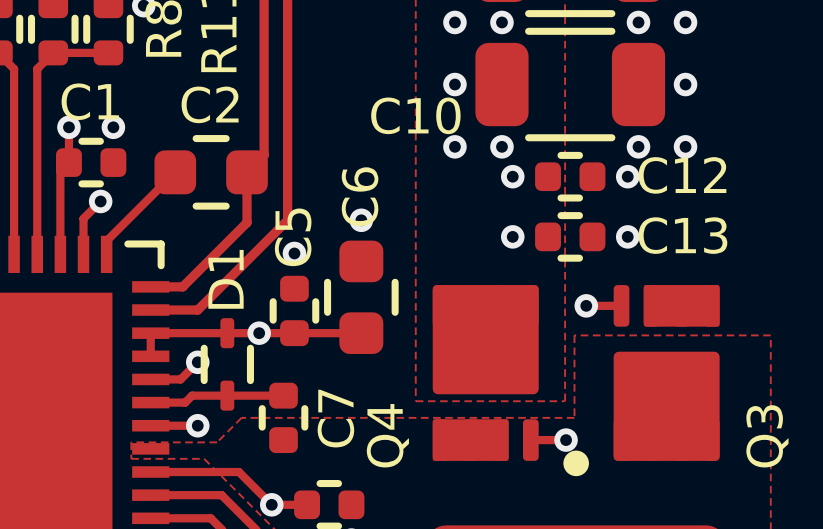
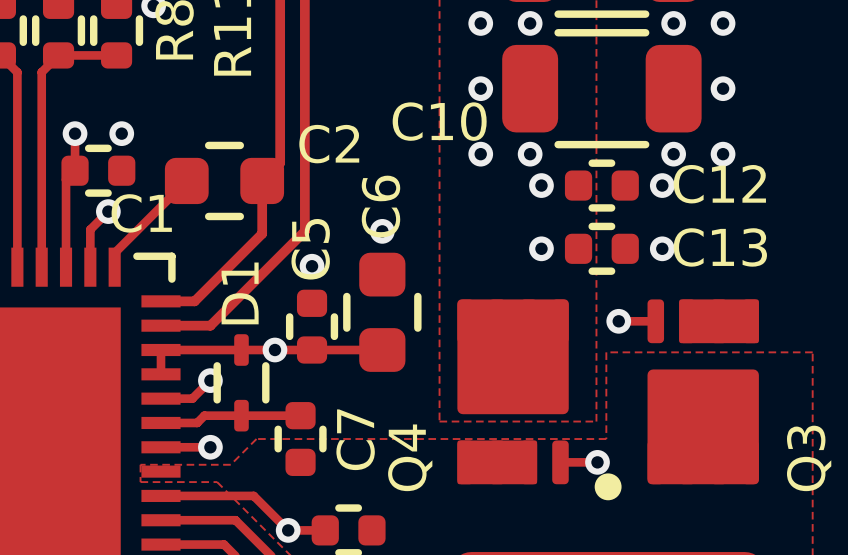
C1 name position: C1 (90, 101) -> C1 (141, 213)
C2 name position: C2 (210, 104) -> C2 (329, 144)

